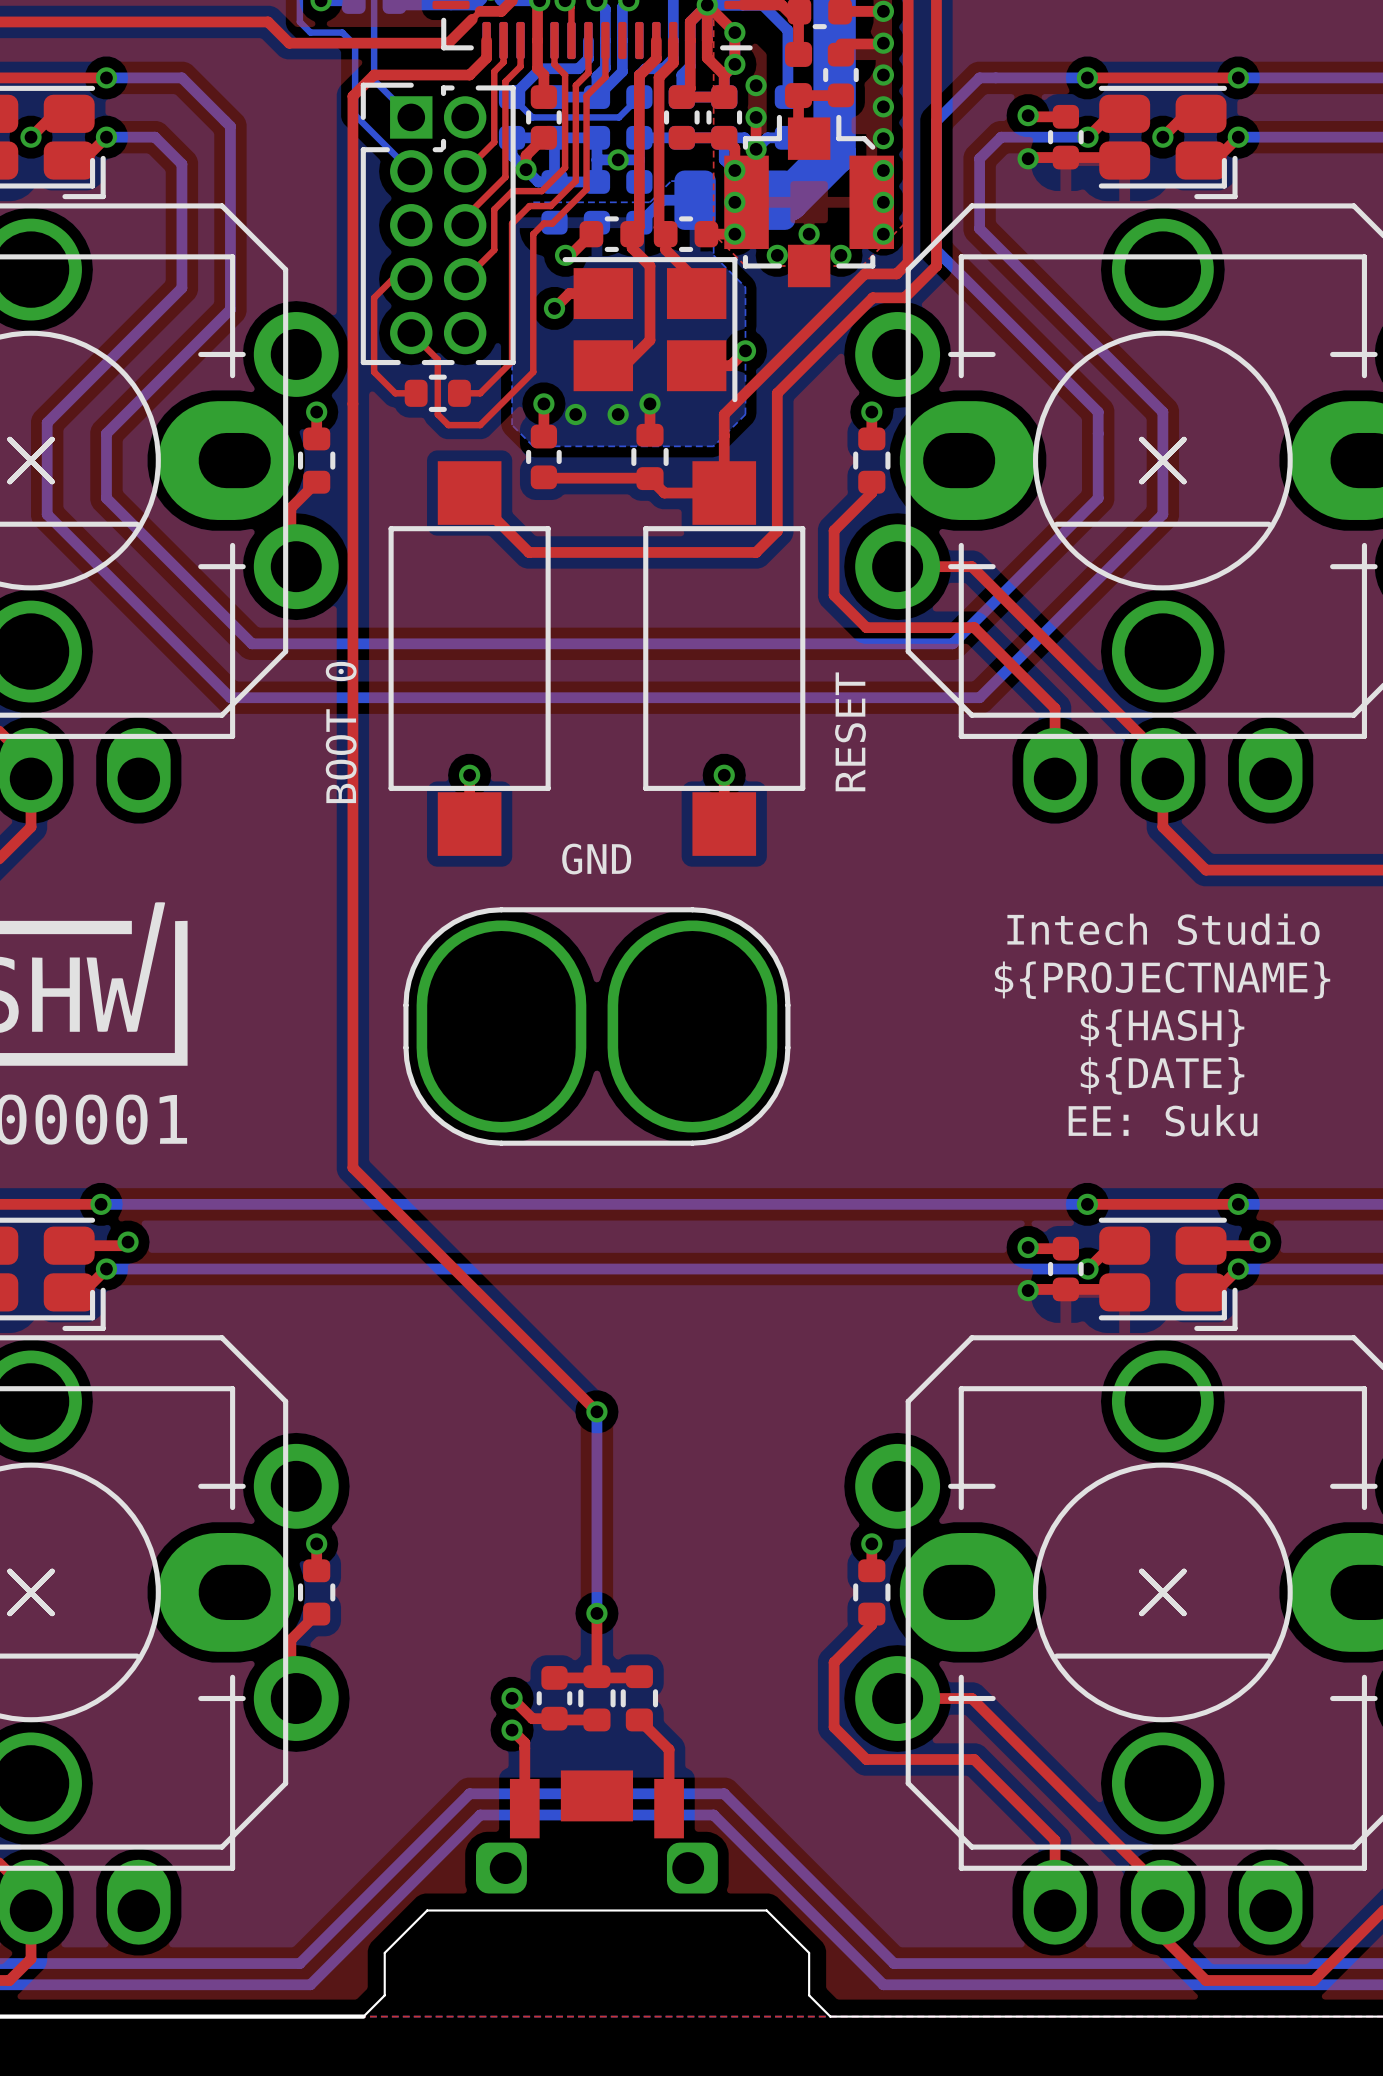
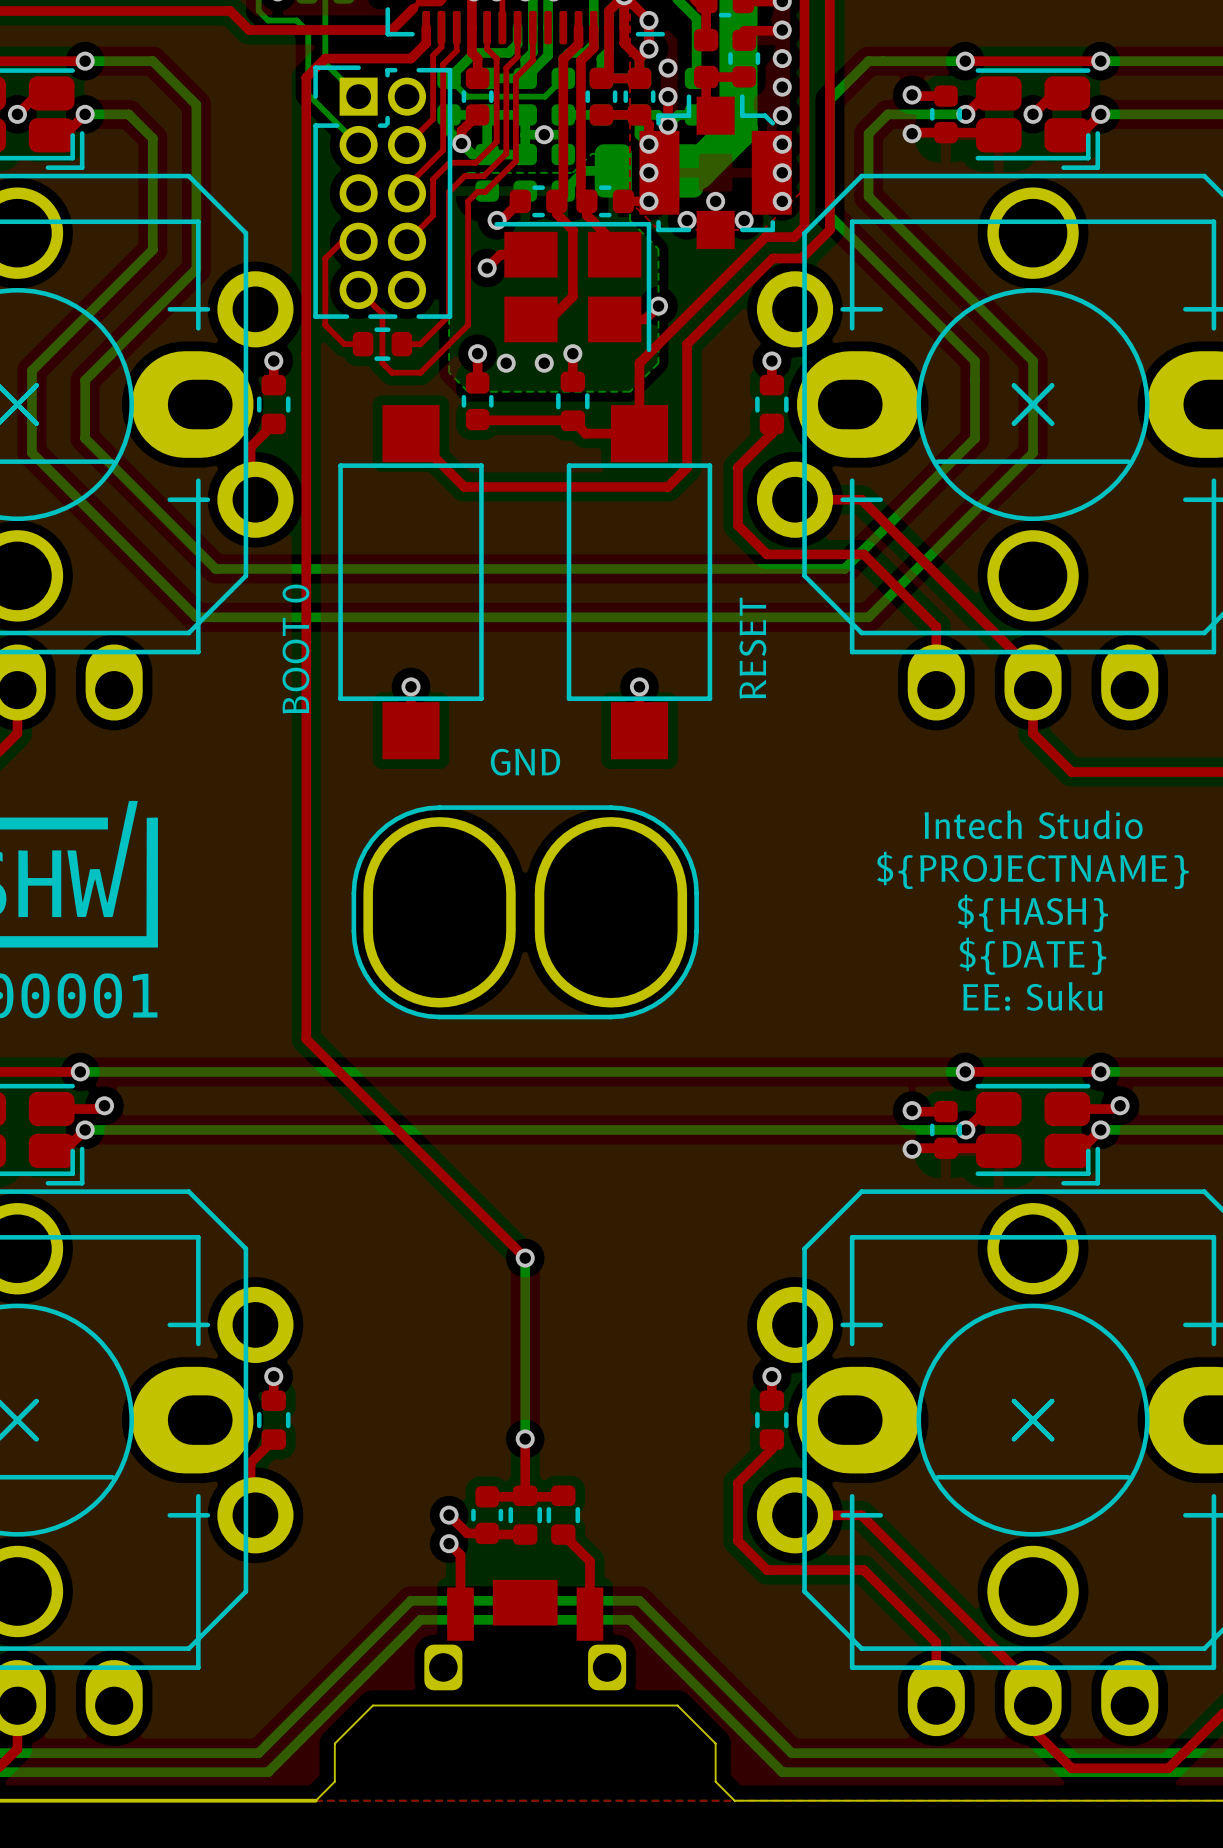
part footprint: [475, 1770, 718, 1894] -> [424, 1579, 627, 1691]

